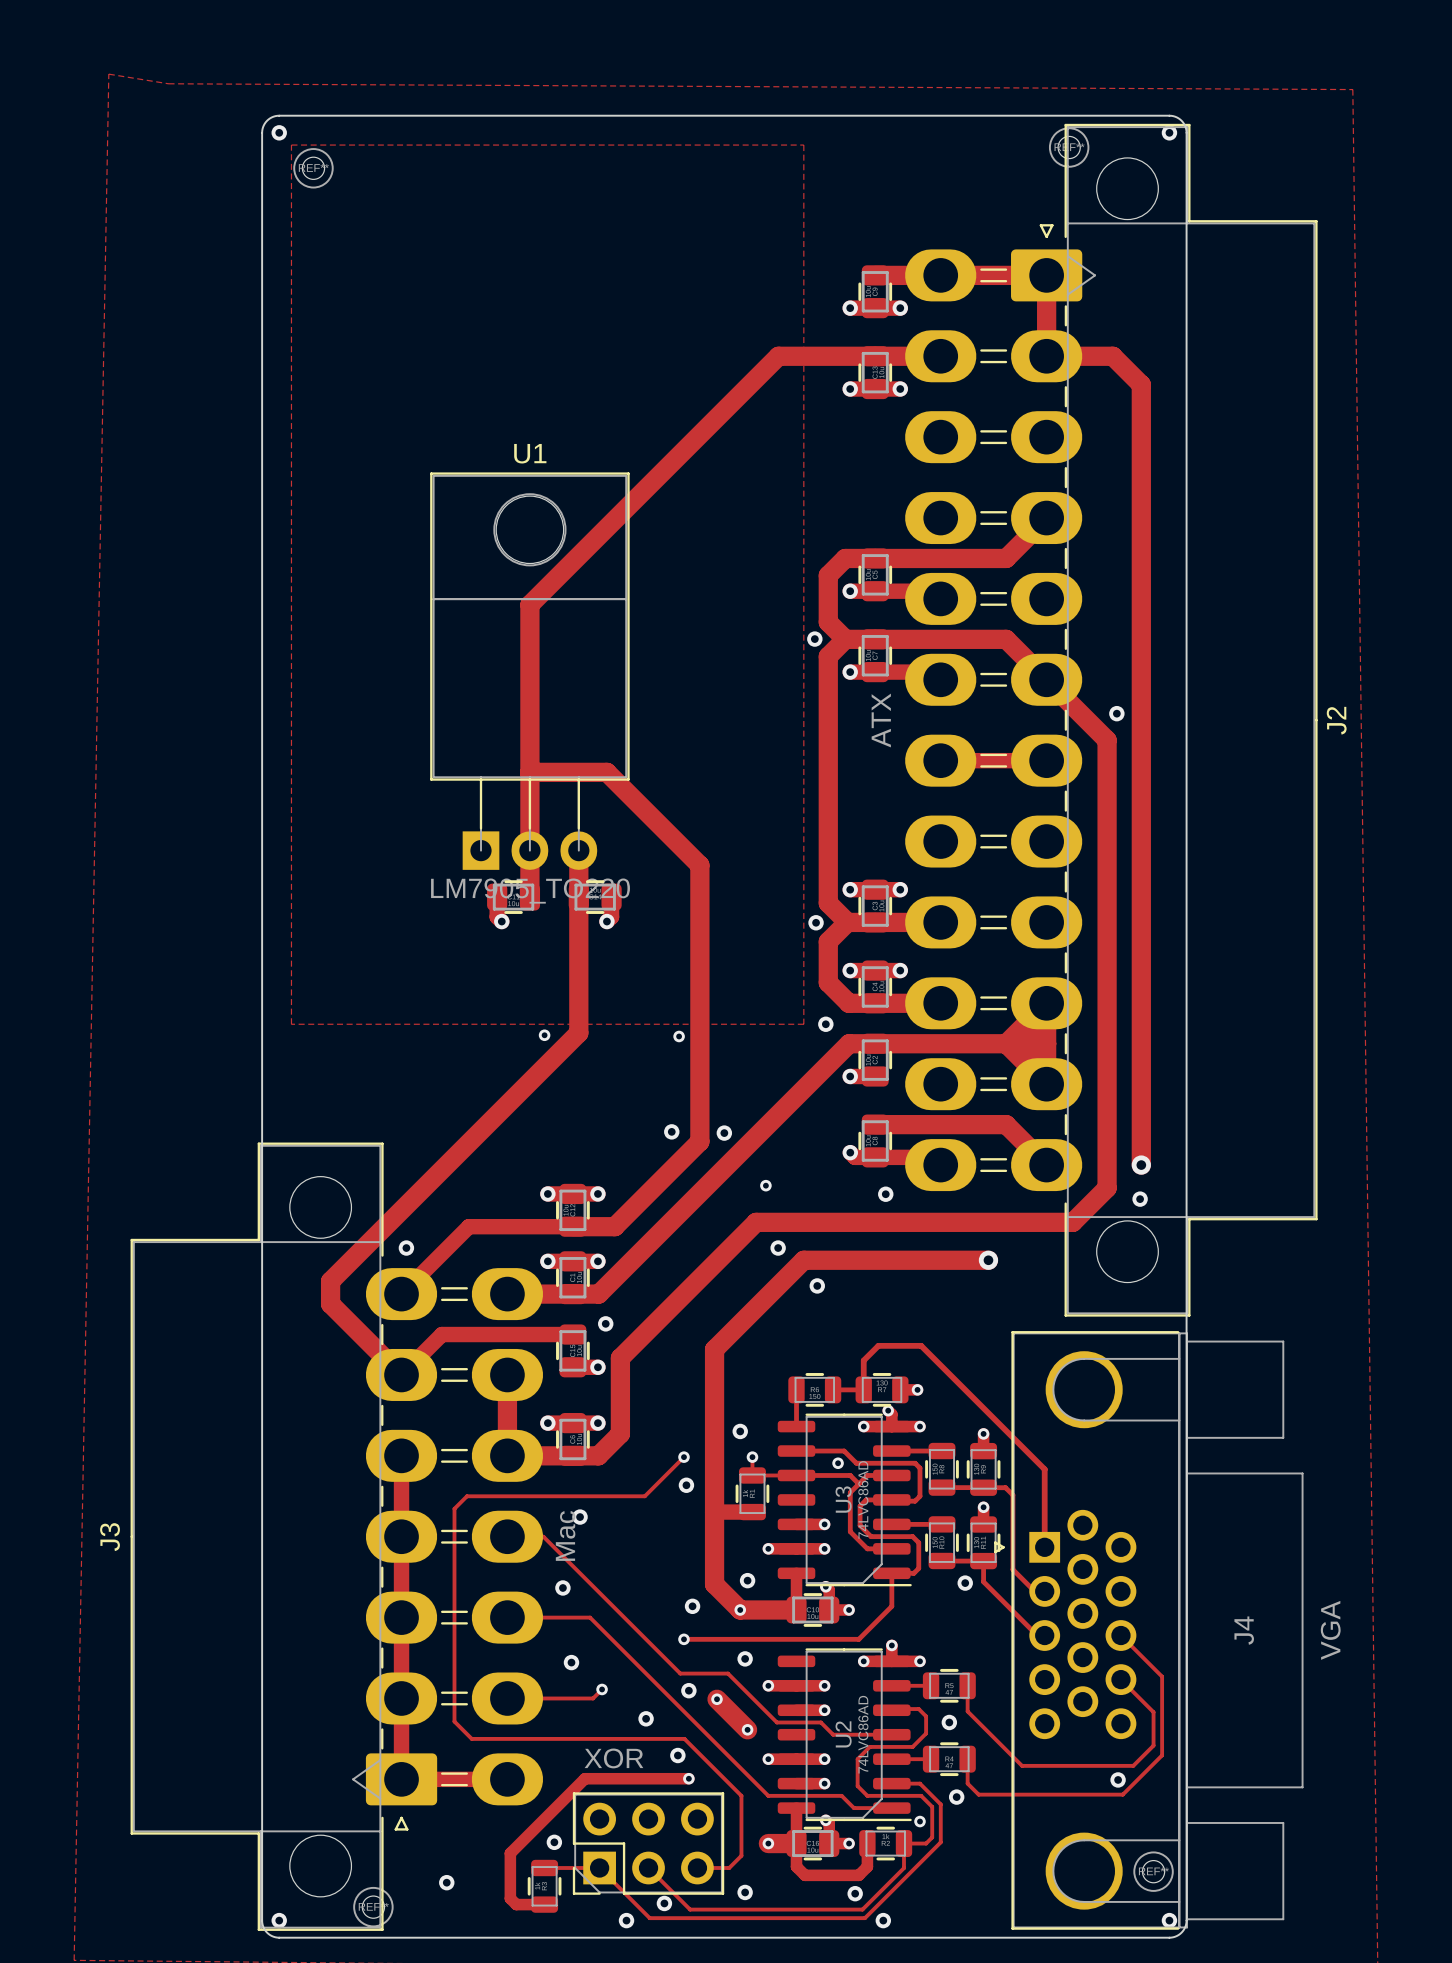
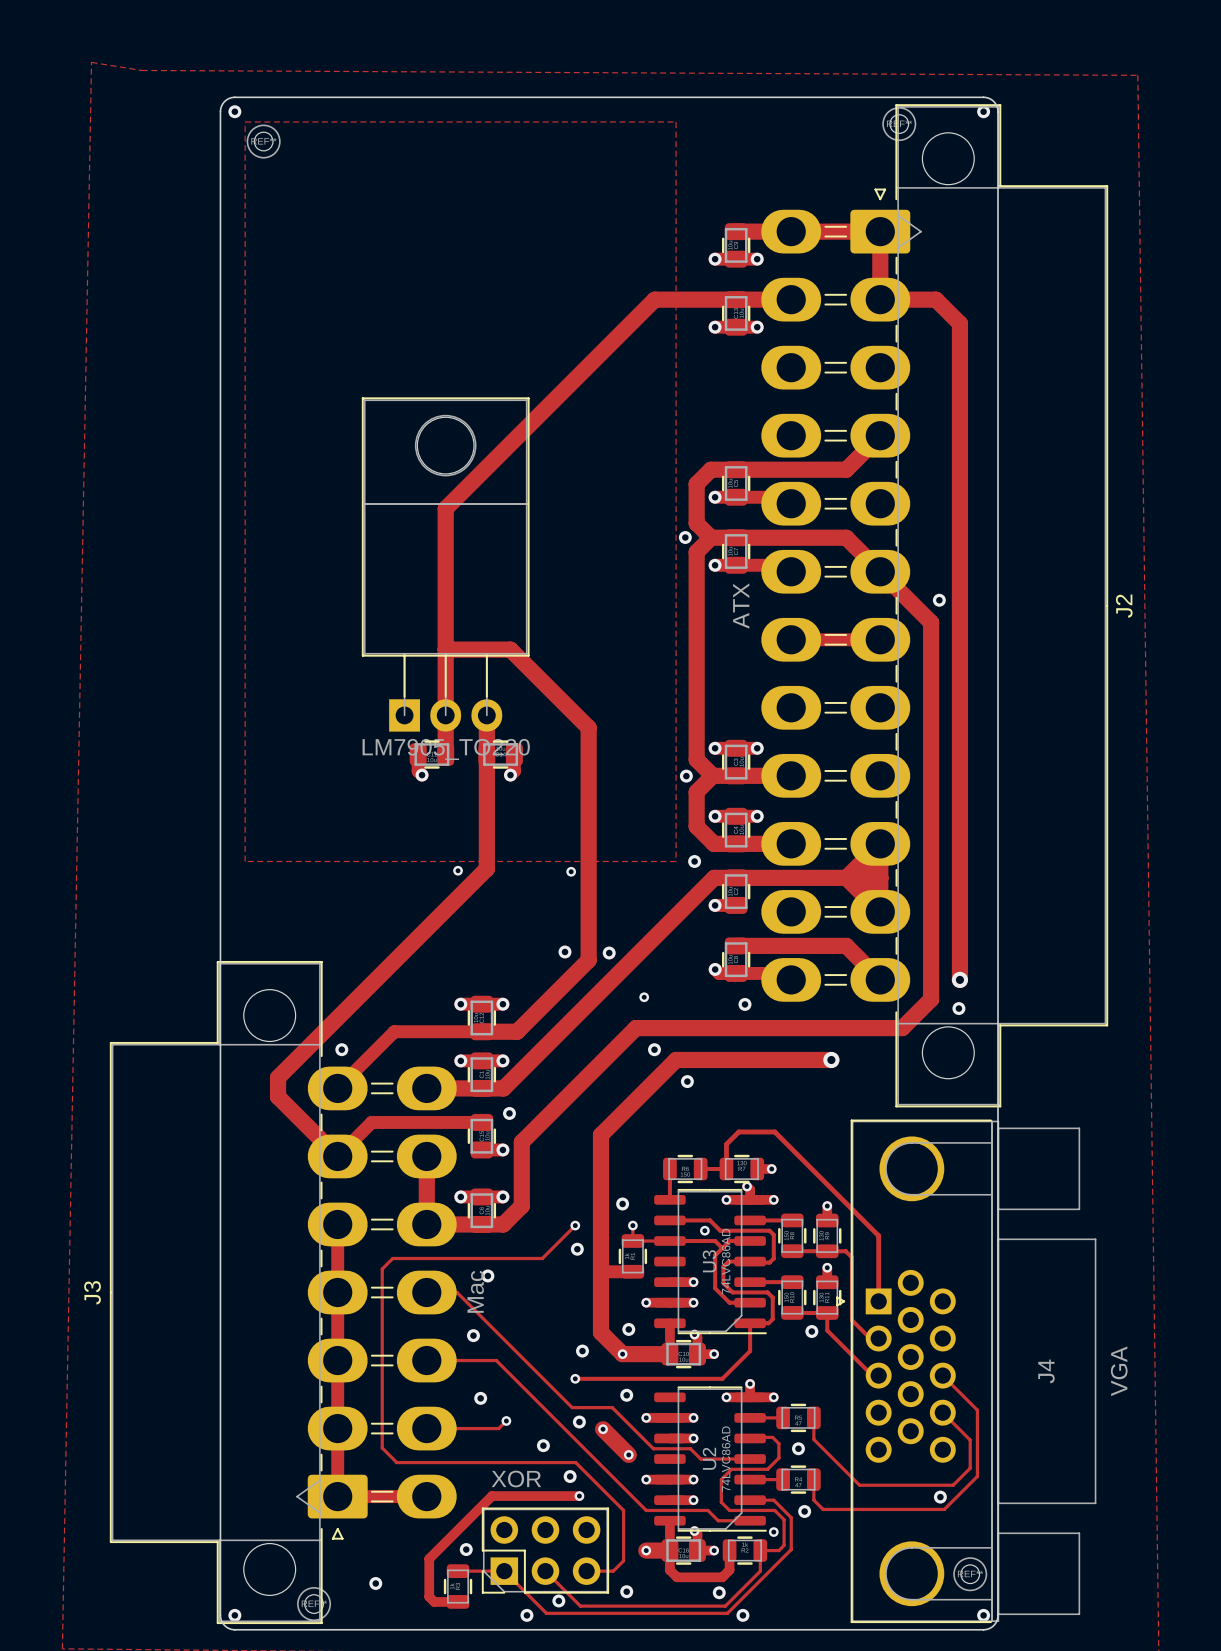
U1 name: U1 (530, 453) -> none

